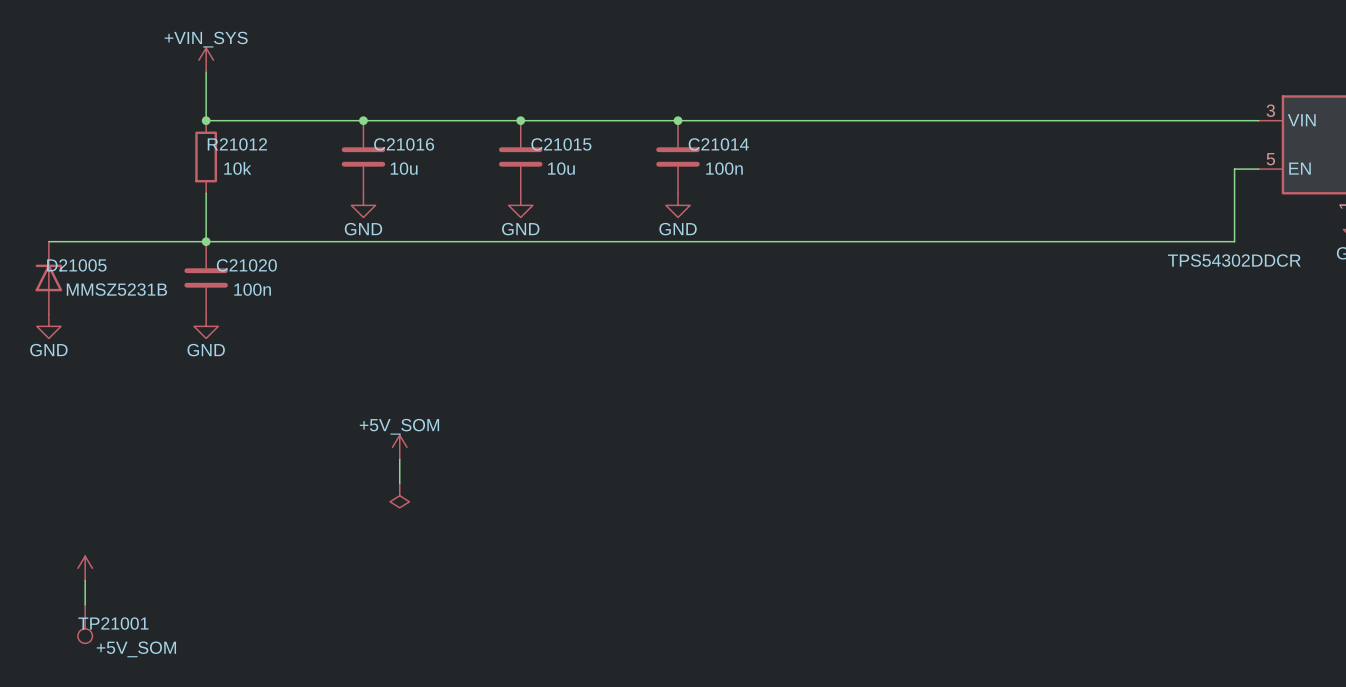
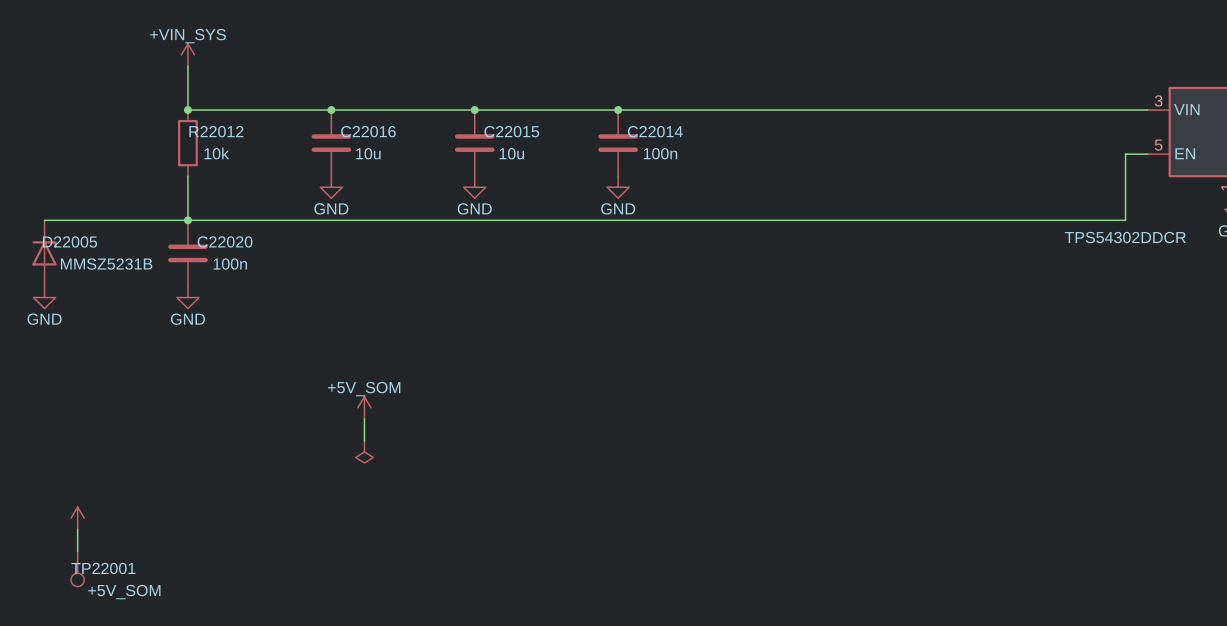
R21012 name: R21012 (237, 144) -> R22012 (216, 131)
C21016 name: C21016 (404, 144) -> C22016 (368, 131)
C21015 name: C21015 (561, 144) -> C22015 (511, 131)
C21014 name: C21014 (718, 144) -> C22014 (655, 131)
D21005 name: D21005 (76, 265) -> D22005 (70, 241)
C21020 name: C21020 (246, 265) -> C22020 (225, 241)
TP21001 name: TP21001 (113, 623) -> TP22001 (103, 568)

